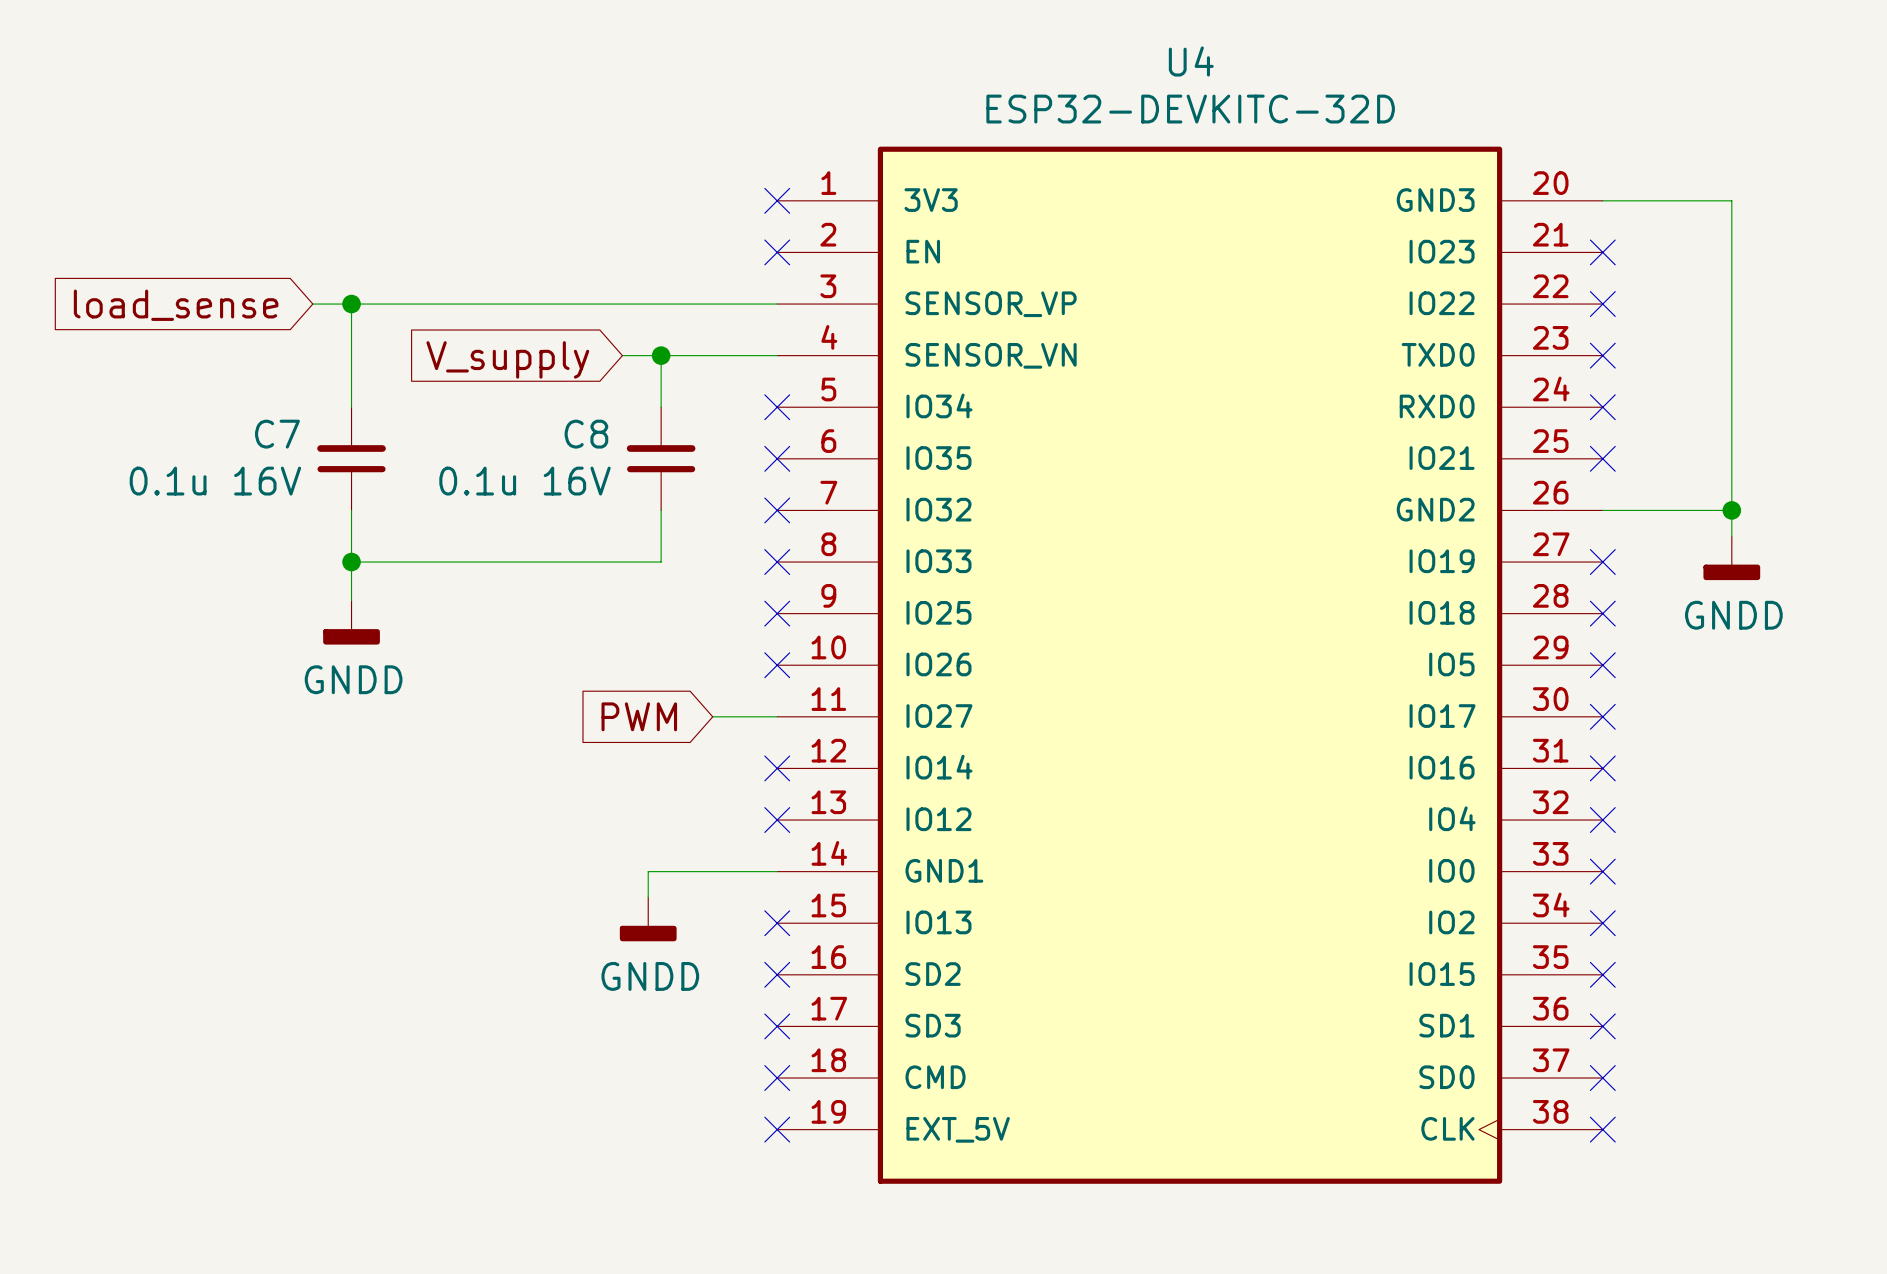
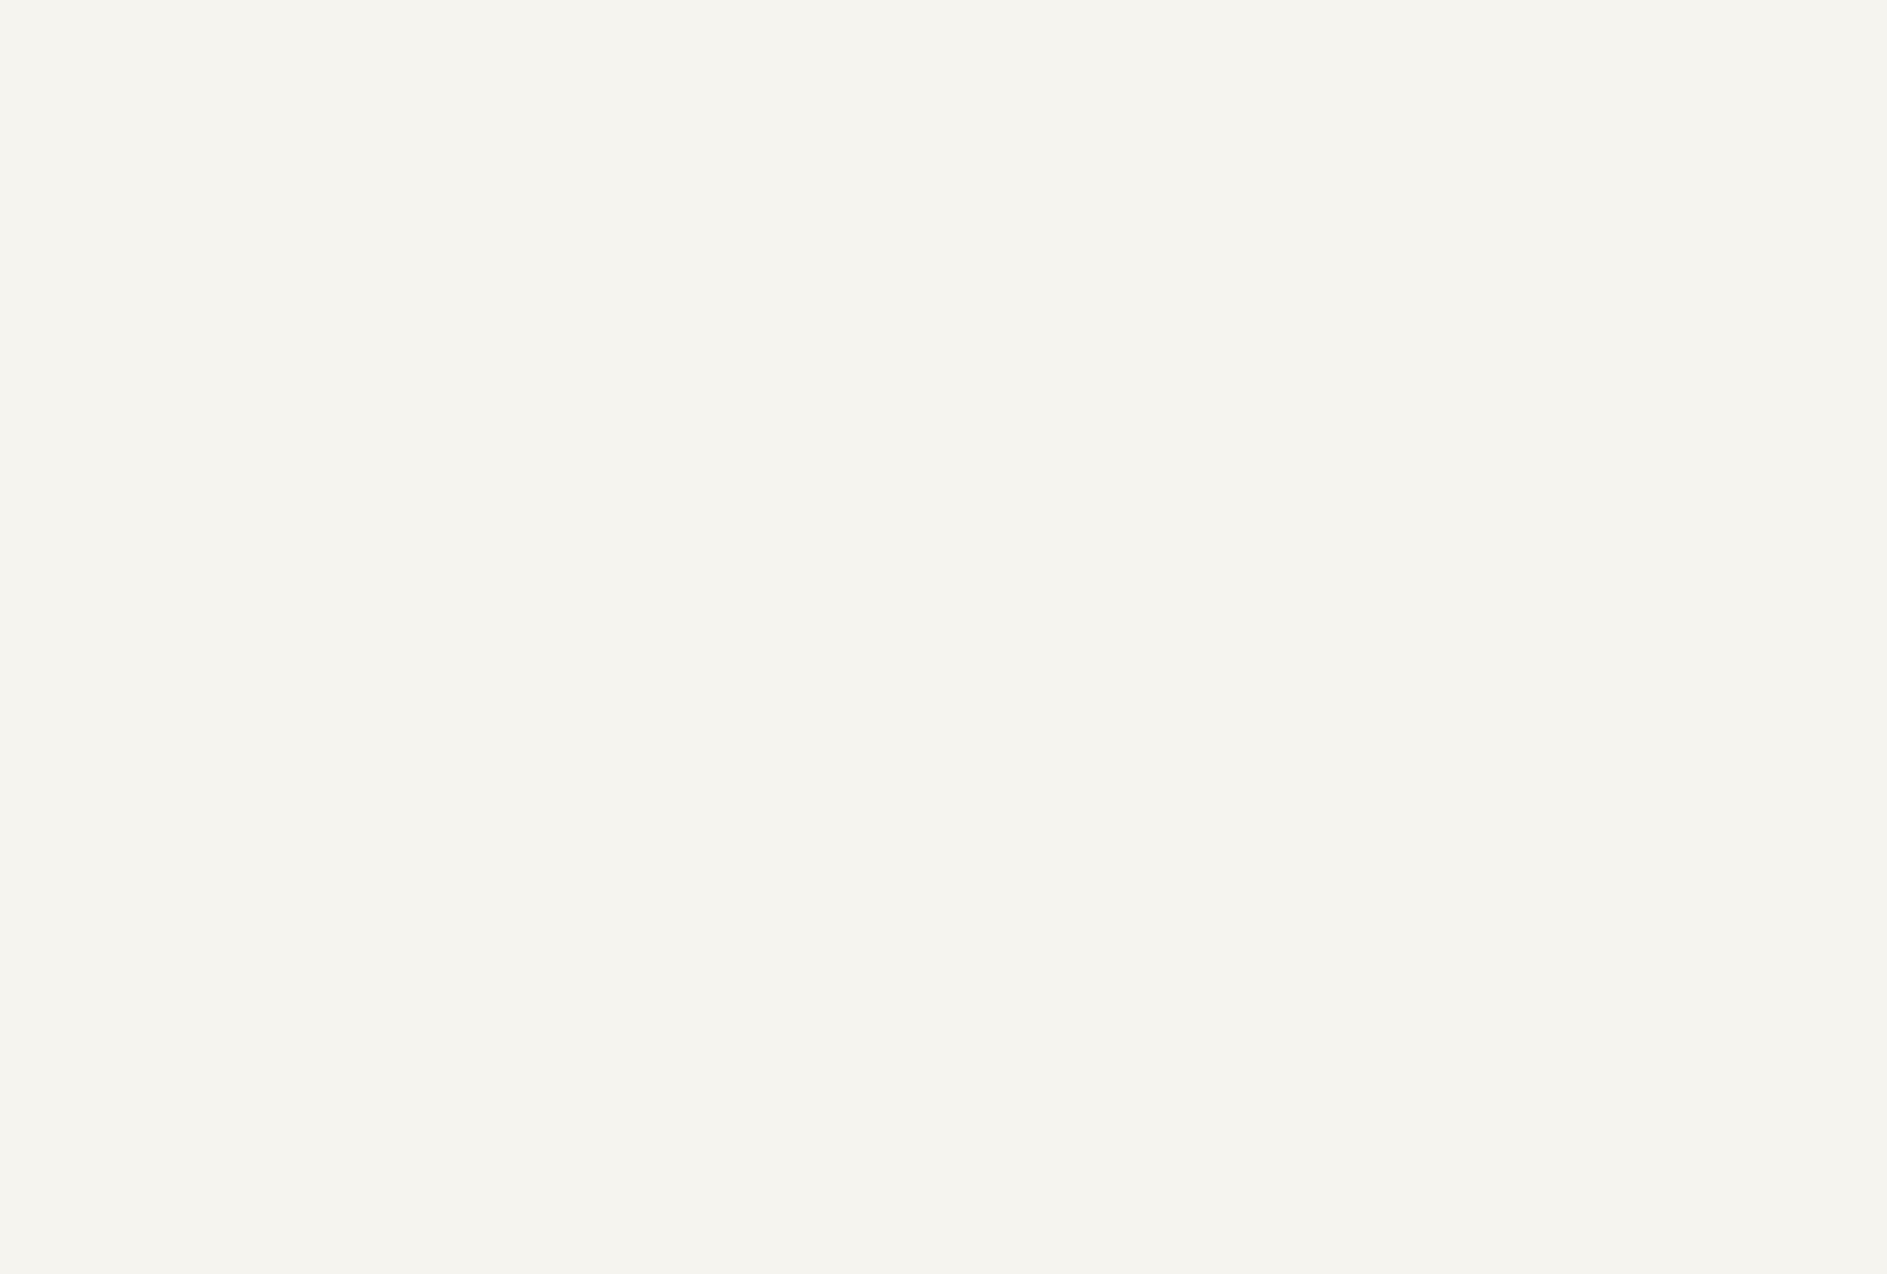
no-connect mark: (777, 200) -> none
wire: (1602, 200) (1731, 200) (1731, 536) -> none
no-connect mark: (777, 252) -> none
no-connect mark: (1602, 252) -> none
wire: (312, 304) (777, 304) -> none
wire: (351, 304) (351, 407) -> none
junction: (351, 304) -> none
no-connect mark: (1602, 304) -> none
global label: load_sense (176, 305) -> none
wire: (622, 355) (777, 355) -> none
wire: (661, 355) (661, 407) -> none
junction: (661, 355) -> none
no-connect mark: (1602, 355) -> none
global label: V_supply (507, 359) -> none
no-connect mark: (777, 407) -> none
no-connect mark: (1602, 407) -> none
C7: 0.1u 16V (351, 458) -> none
C8: 0.1u 16V (661, 458) -> none
no-connect mark: (777, 458) -> none
no-connect mark: (1602, 458) -> none
wire: (351, 510) (351, 600) -> none
wire: (661, 510) (661, 562) (351, 562) -> none
no-connect mark: (777, 510) -> none
wire: (1602, 510) (1731, 510) -> none
junction: (1731, 510) -> none
power symbol: GNDD (1731, 558) -> none
junction: (351, 562) -> none
no-connect mark: (777, 562) -> none
no-connect mark: (1602, 562) -> none
no-connect mark: (777, 613) -> none
no-connect mark: (1602, 613) -> none
power symbol: GNDD (351, 622) -> none
no-connect mark: (777, 665) -> none
U4: ESP32-DEVKITC-32D (1190, 665) -> none
no-connect mark: (1602, 665) -> none
global label: PWM (639, 716) -> none
wire: (712, 716) (777, 716) -> none
no-connect mark: (1602, 716) -> none
no-connect mark: (777, 768) -> none
no-connect mark: (1602, 768) -> none
no-connect mark: (777, 820) -> none
no-connect mark: (1602, 820) -> none
wire: (777, 871) (648, 871) (648, 897) -> none
no-connect mark: (1602, 871) -> none
power symbol: GNDD (648, 919) -> none
no-connect mark: (777, 923) -> none
no-connect mark: (1602, 923) -> none
no-connect mark: (777, 974) -> none
no-connect mark: (1602, 974) -> none
no-connect mark: (777, 1026) -> none
no-connect mark: (1602, 1026) -> none
no-connect mark: (777, 1078) -> none
no-connect mark: (1602, 1078) -> none
no-connect mark: (777, 1129) -> none
no-connect mark: (1602, 1129) -> none

